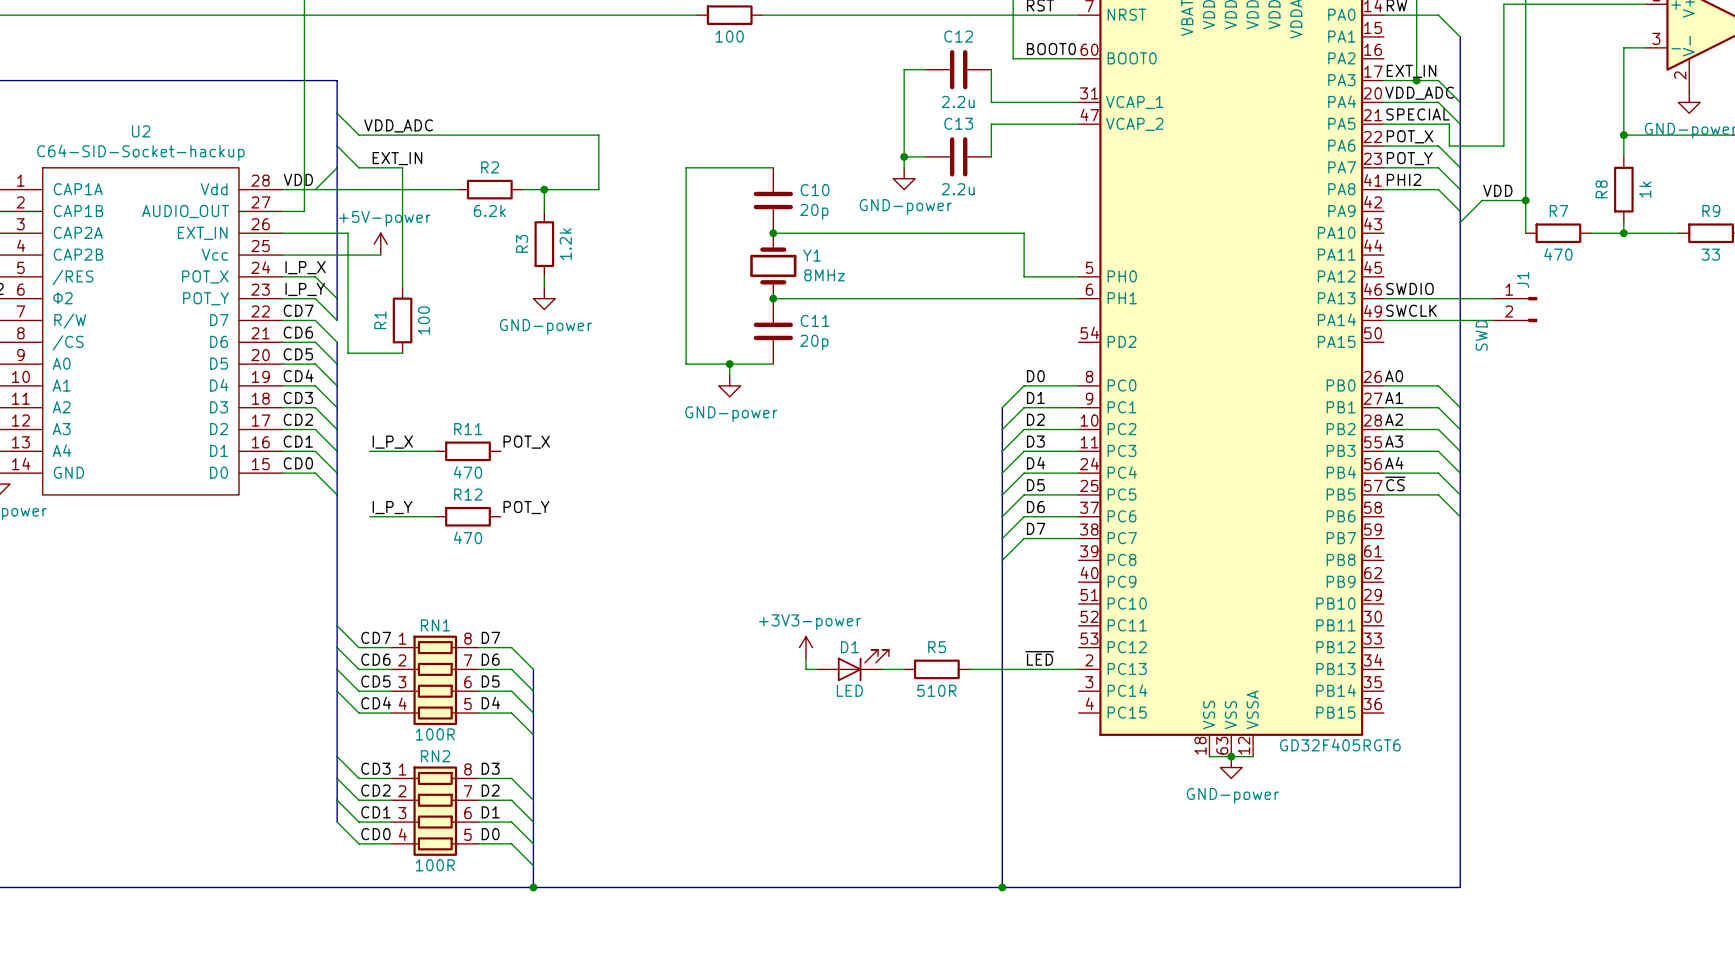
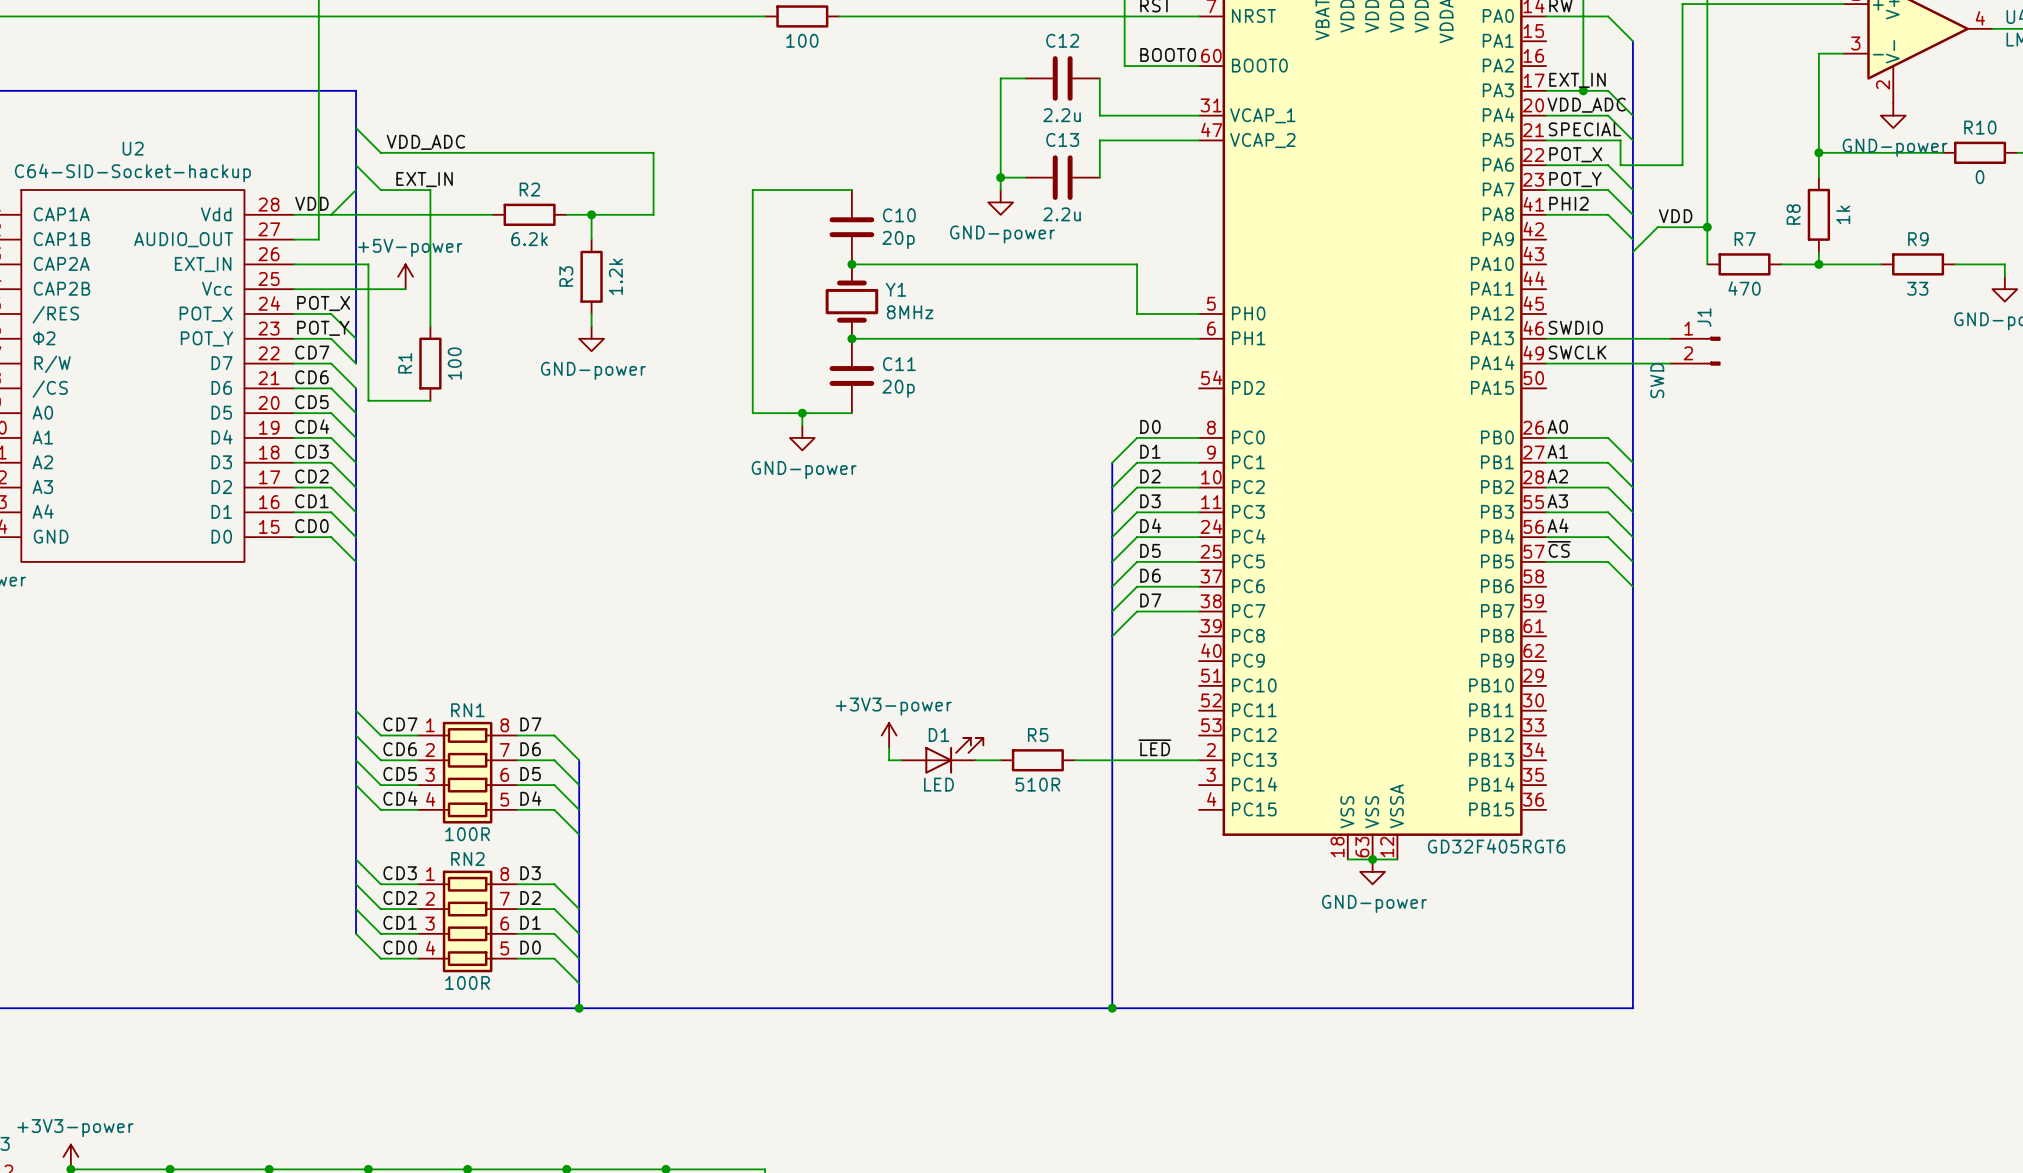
label: I_P_X (305, 267) -> POT_X (323, 303)
label: I_P_Y (305, 289) -> POT_Y (323, 328)
label: I_P_X (392, 442) -> none
label: POT_X (526, 442) -> none
wire: (369, 451) (435, 451) -> none
R11: 470 (467, 451) -> none
label: I_P_Y (392, 507) -> none
label: POT_Y (526, 507) -> none
wire: (369, 516) (435, 516) -> none
R12: 470 (467, 516) -> none

